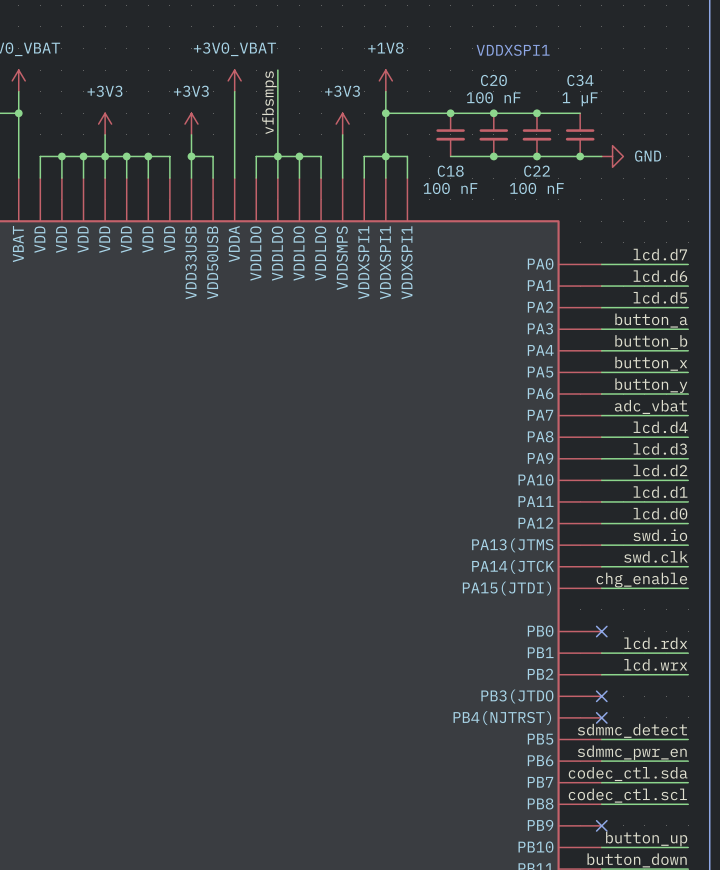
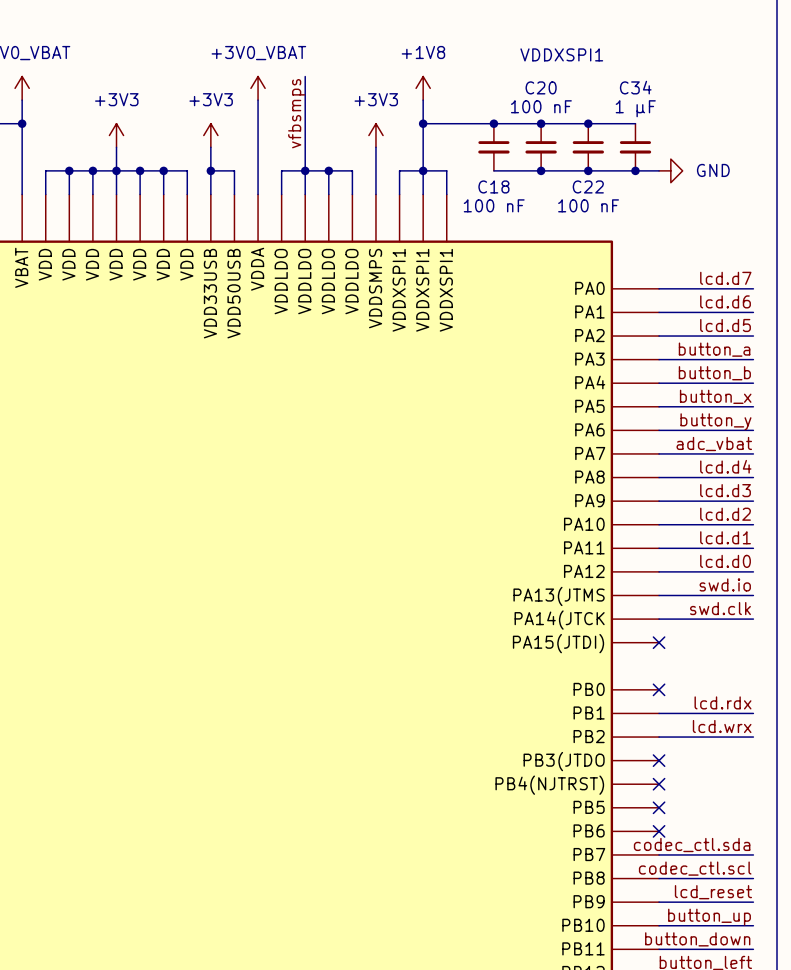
label: chg_enable (641, 580) -> none
wire: (601, 588) (688, 588) -> none
no-connect mark: none -> (659, 642)
label: sdmmc_detect (632, 730) -> none
wire: (601, 739) (688, 739) -> none
no-connect mark: none -> (659, 807)
label: sdmmc_pwr_en (632, 752) -> none
wire: (601, 761) (688, 761) -> (659, 902) (753, 902)
no-connect mark: none -> (659, 831)
label: none -> lcd_reset (713, 892)
no-connect mark: (601, 825) -> none

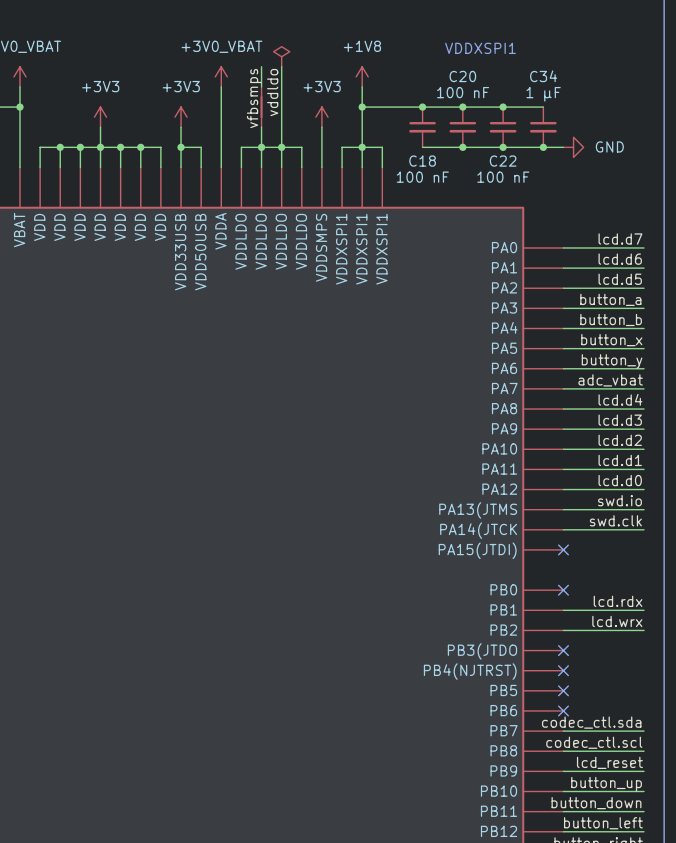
power symbol: none -> (281, 56)
wire: none -> (281, 66) (281, 147)
label: none -> vddldo (272, 92)
part: none -> (261, 107)

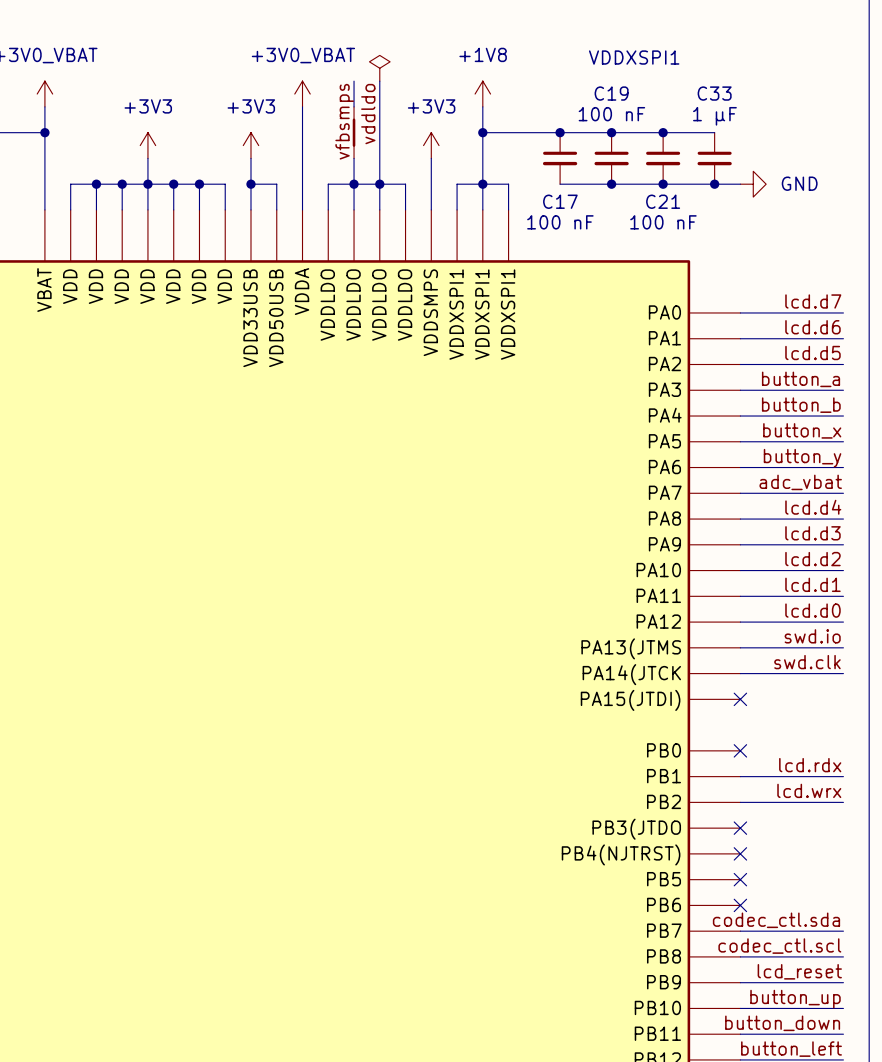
C20 name: C20 (462, 76) -> C19 (611, 93)
C34 name: C34 (543, 76) -> C33 (714, 93)
C18 name: C18 (422, 161) -> C17 (560, 201)
C22 name: C22 (503, 161) -> C21 (663, 201)

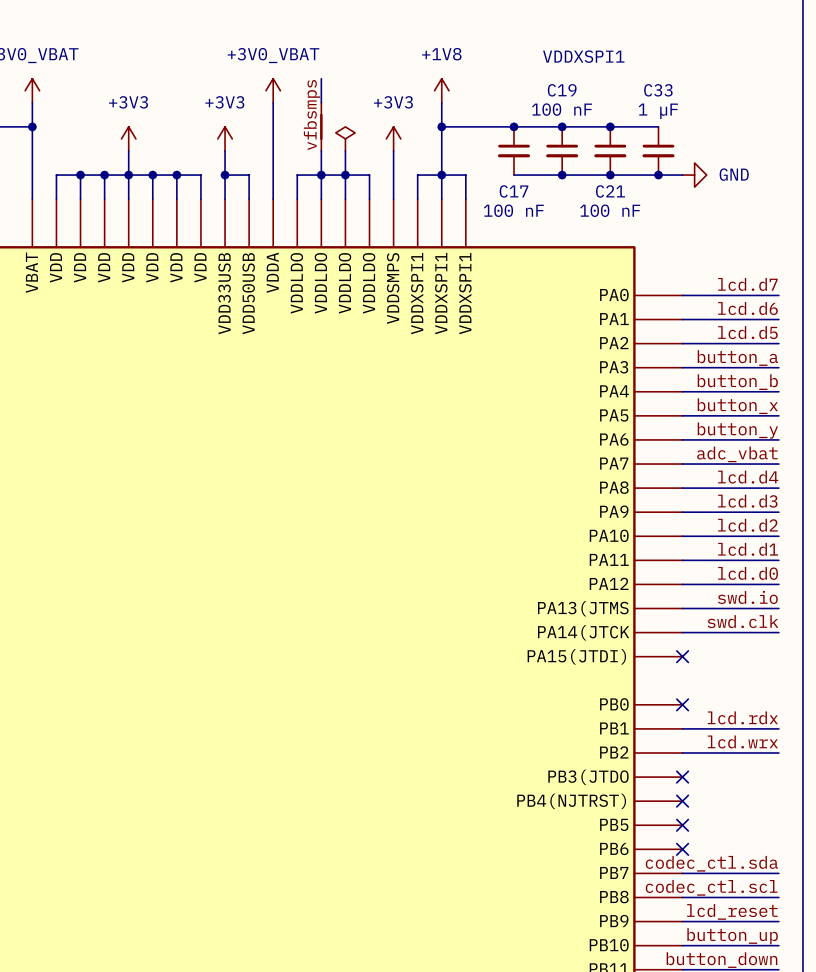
power symbol position: (379, 68) -> (345, 138)
wire: (379, 81) (379, 158) -> none
label: vddldo (368, 114) -> none

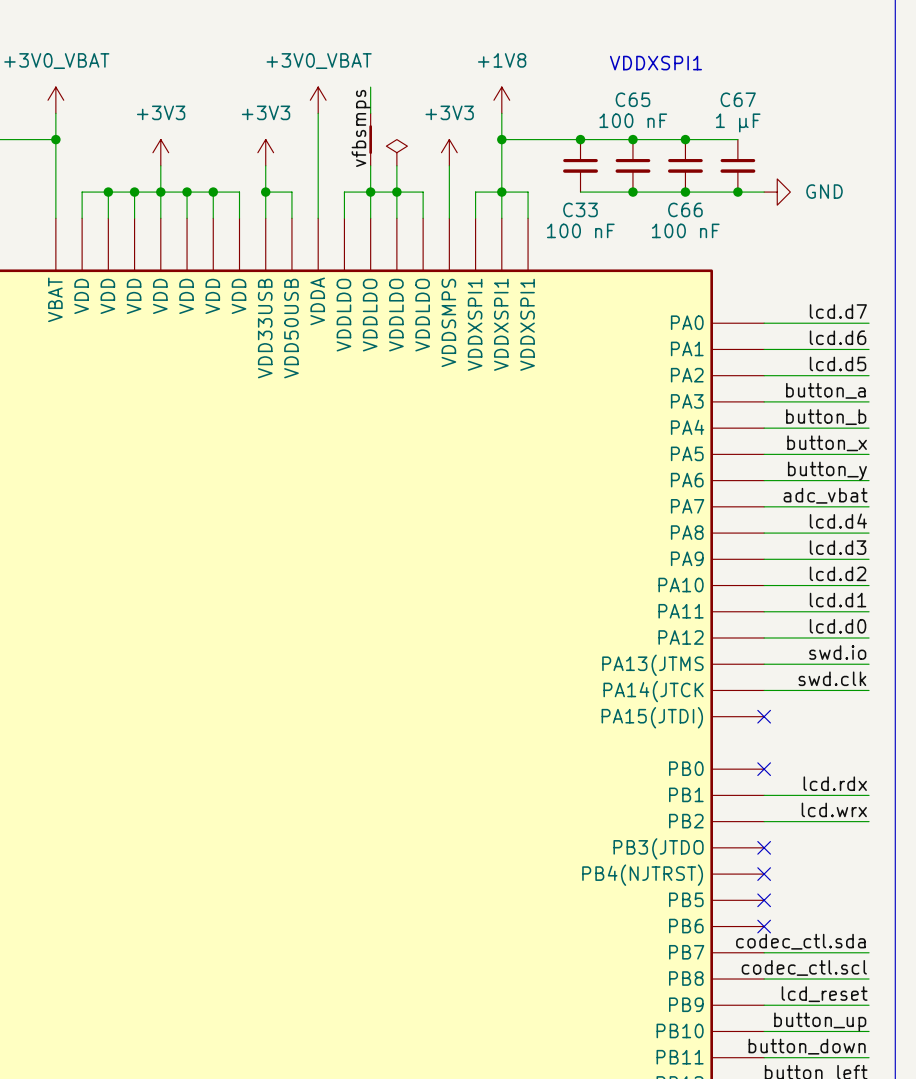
C19 name: C19 (562, 90) -> C65 (632, 99)
C33 name: C33 (658, 90) -> C67 (738, 99)
C17 name: C17 (514, 191) -> C33 (580, 209)
C21 name: C21 (610, 191) -> C66 (685, 209)

